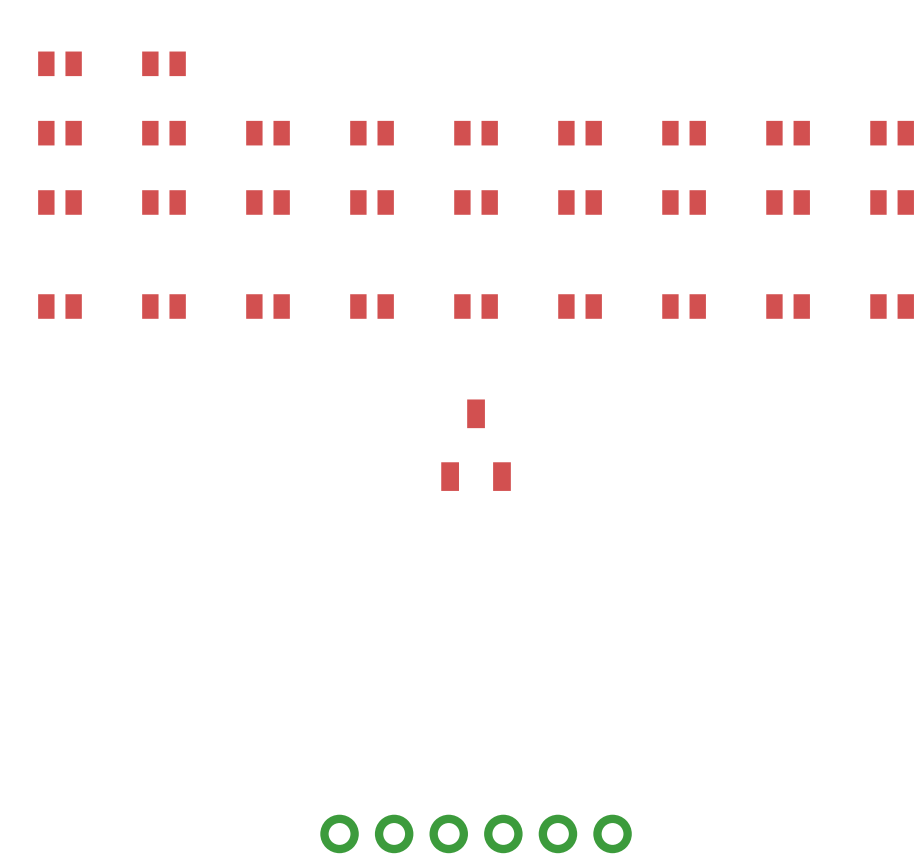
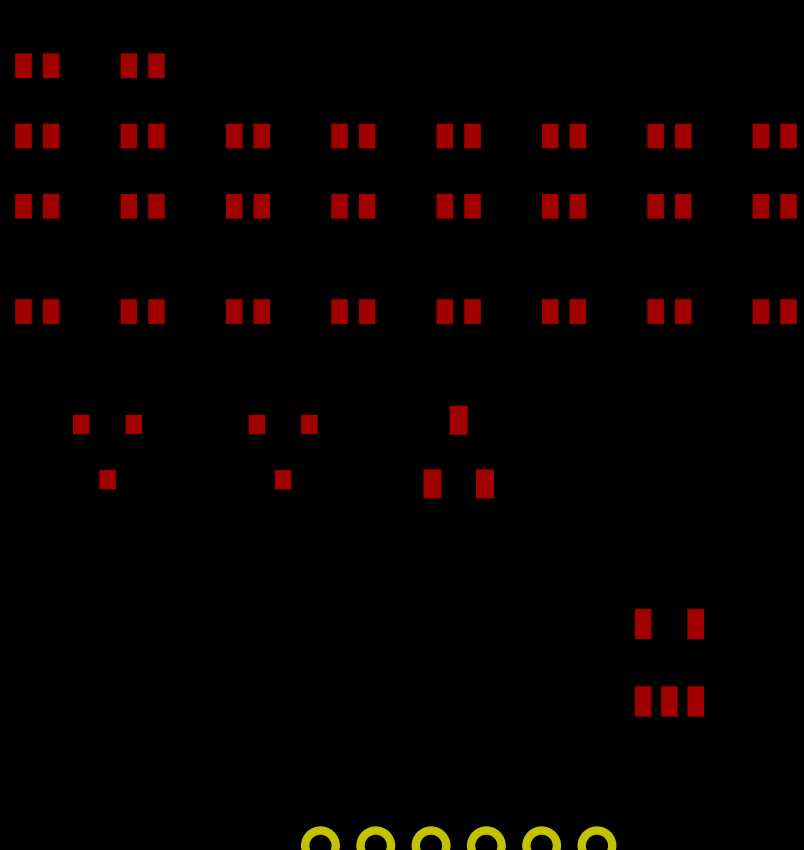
part: none -> (107, 452)
part: none -> (283, 452)
part: none -> (669, 662)

